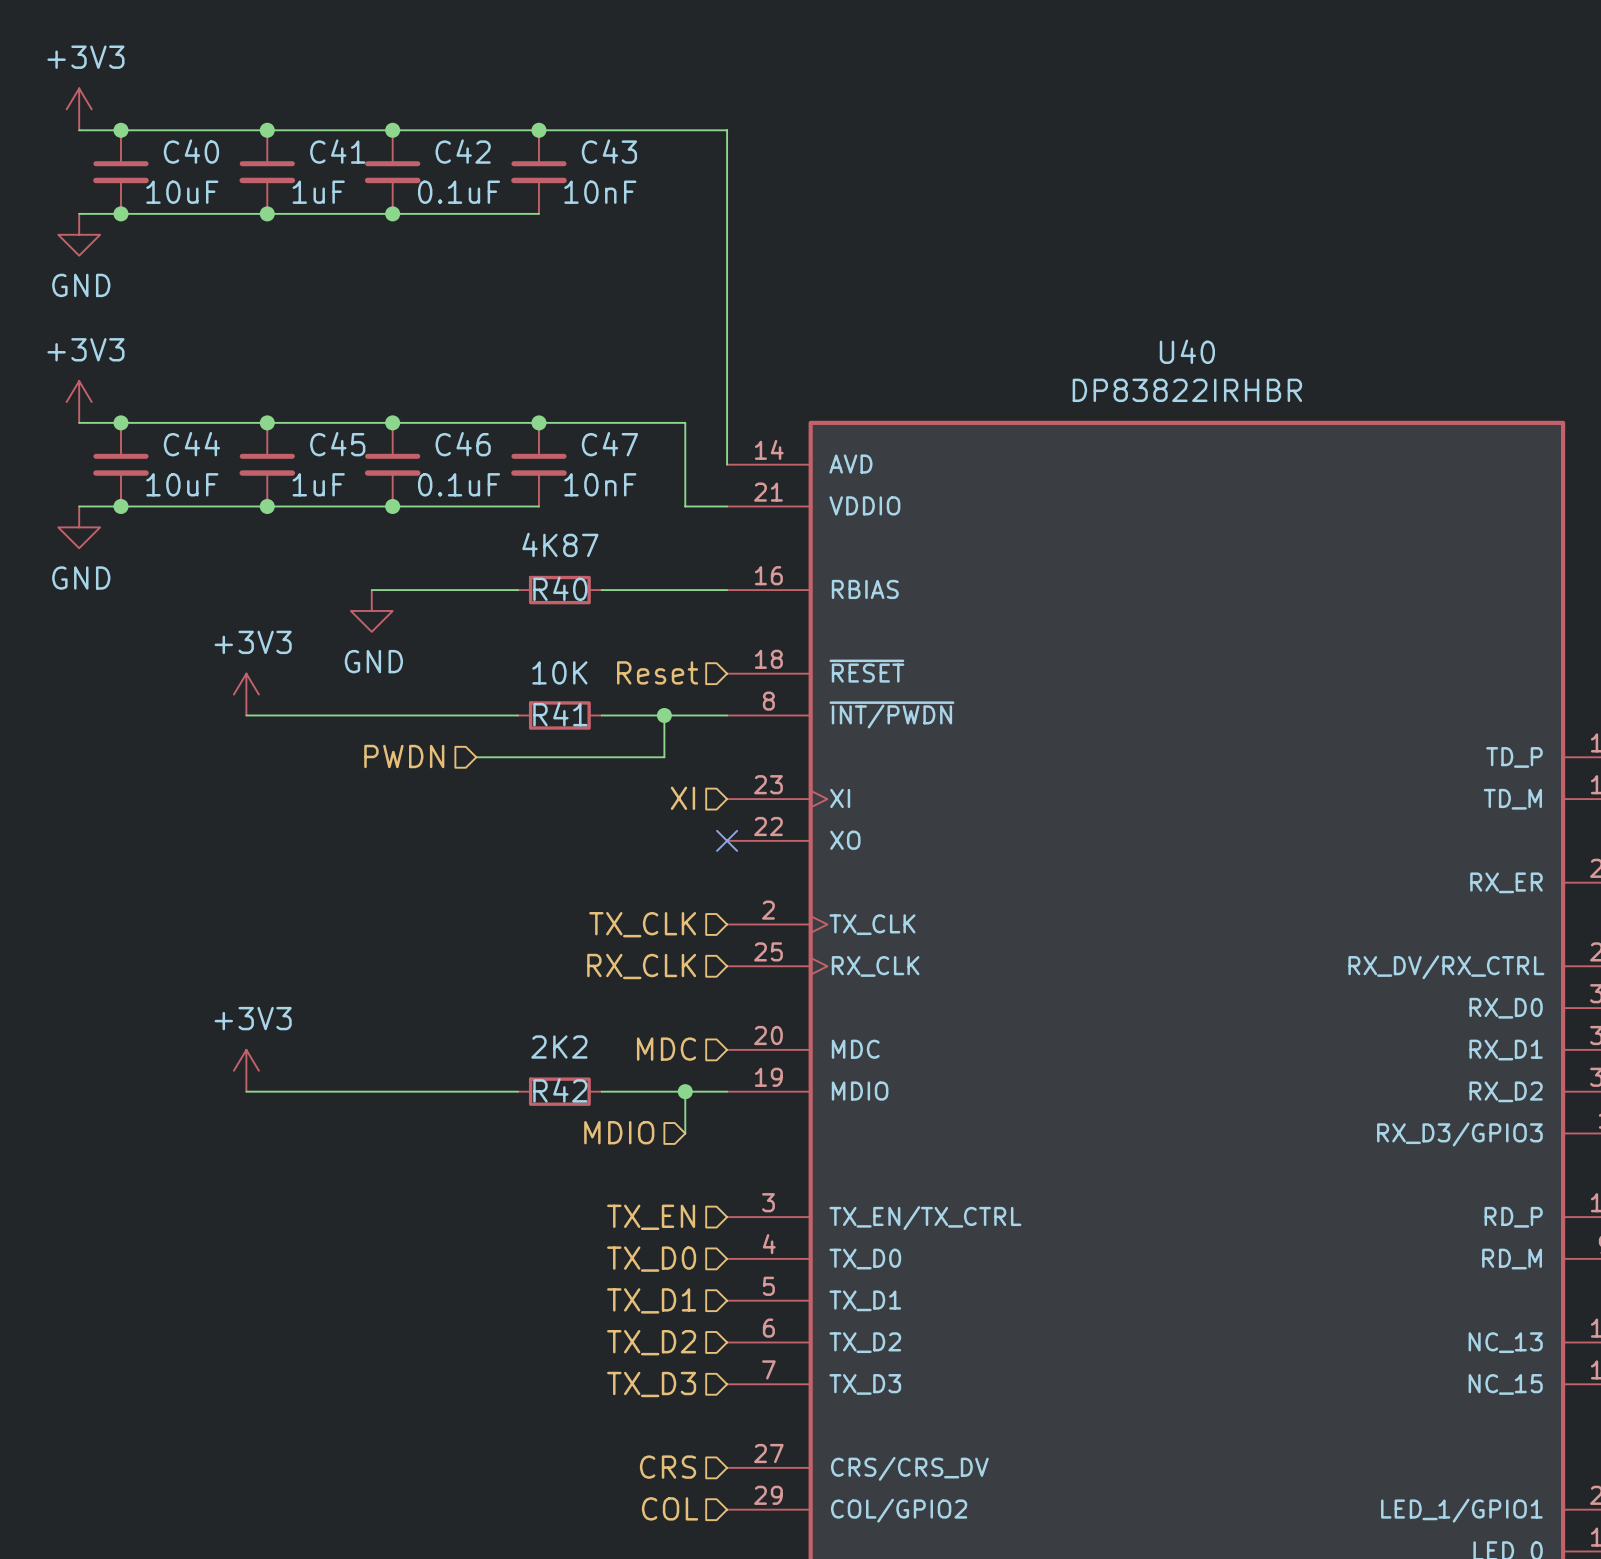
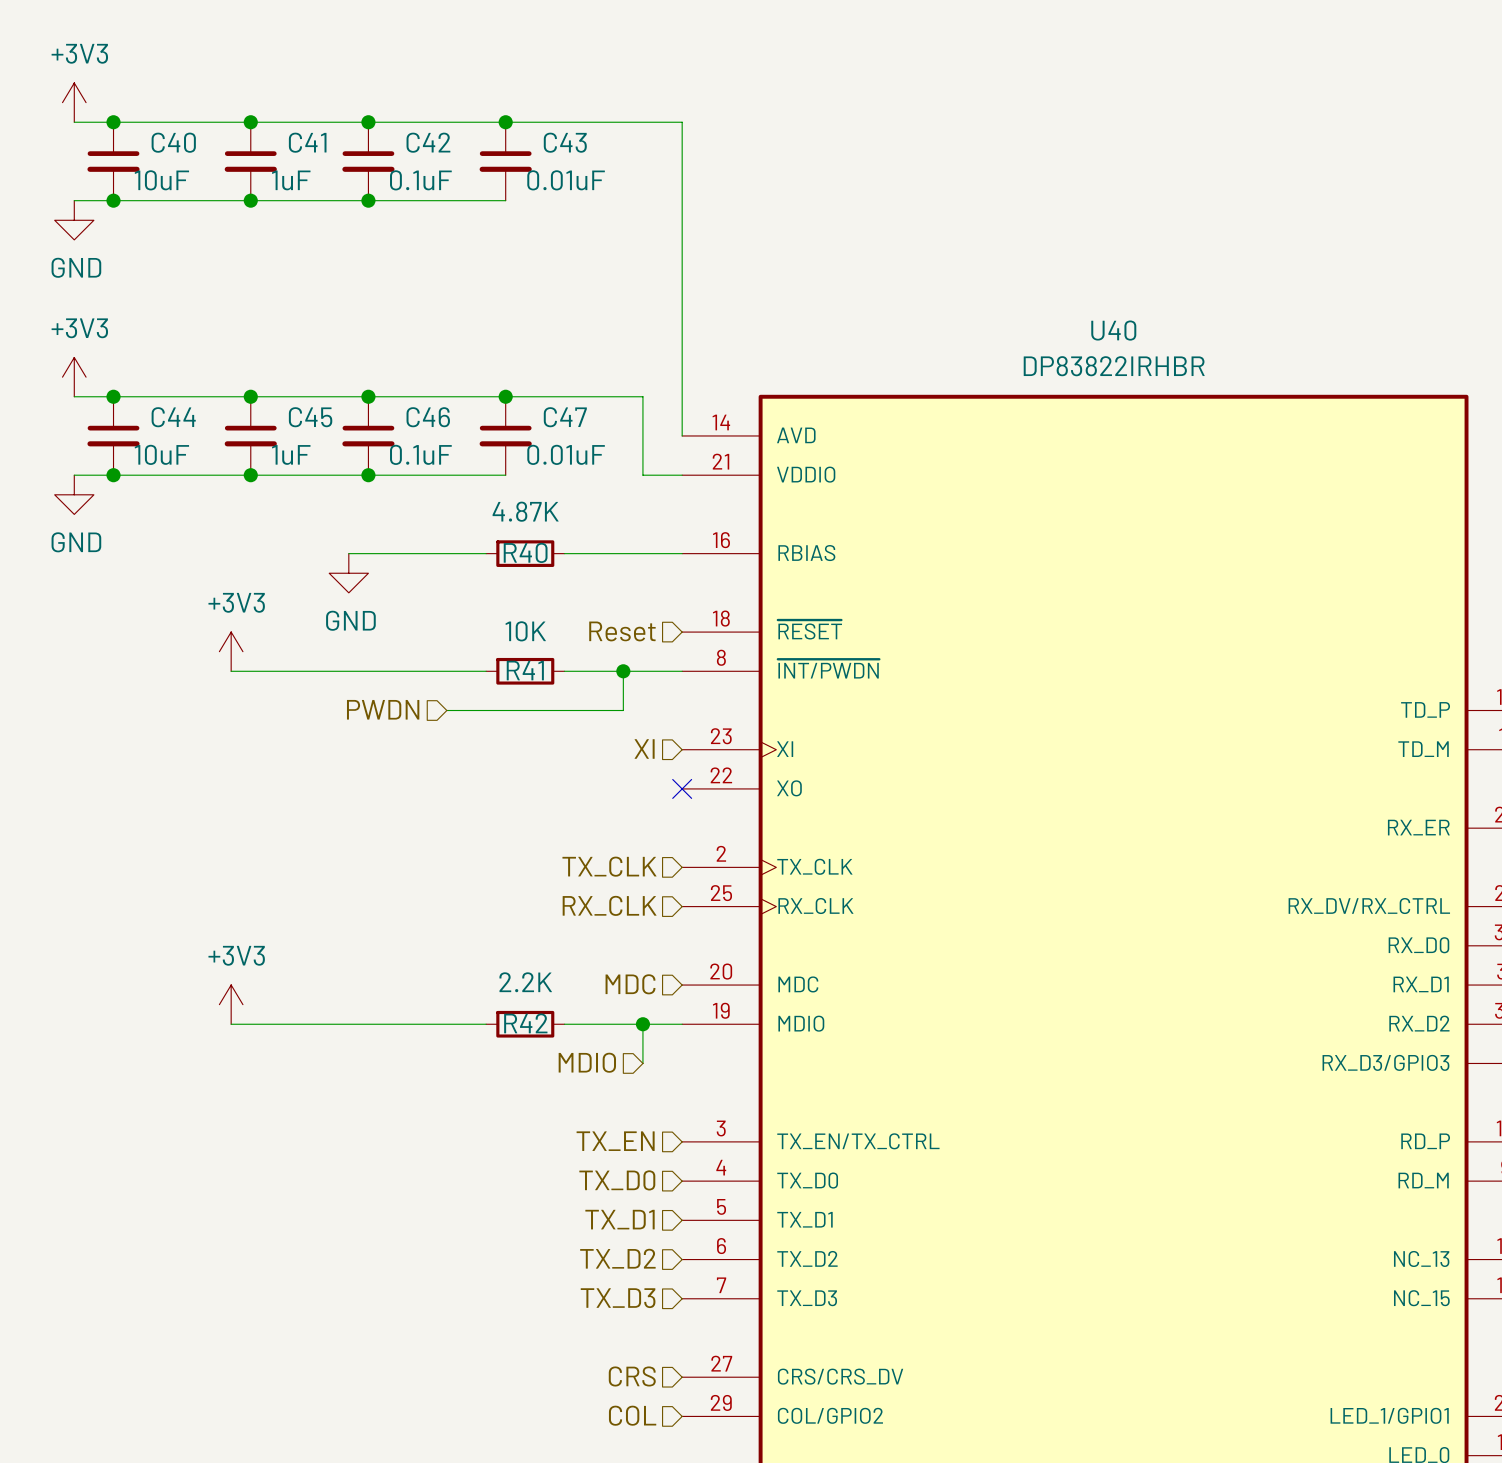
C43 value: 10nF (600, 192) -> 0.01uF (566, 180)
C47 value: 10nF (600, 484) -> 0.01uF (566, 454)
R40 value: 4K87 (560, 544) -> 4.87K (525, 511)
R42 value: 2K2 (559, 1047) -> 2.2K (525, 982)

